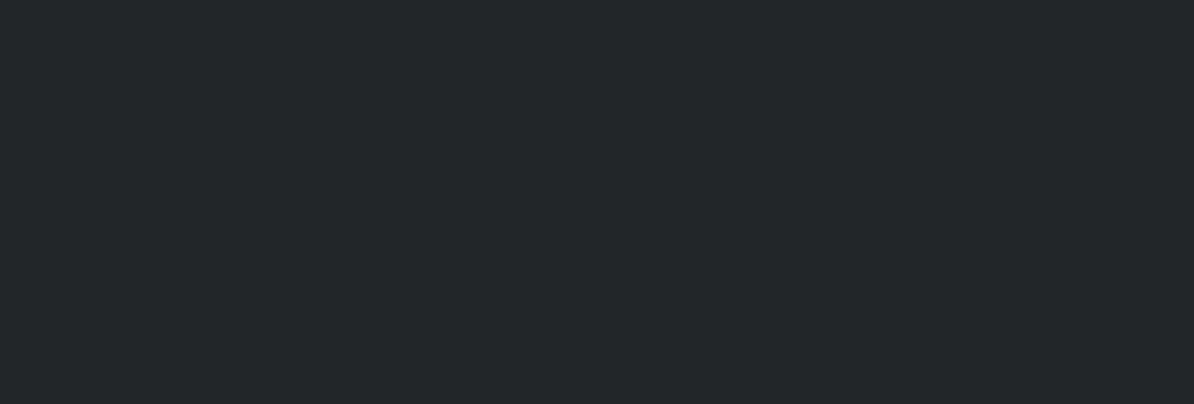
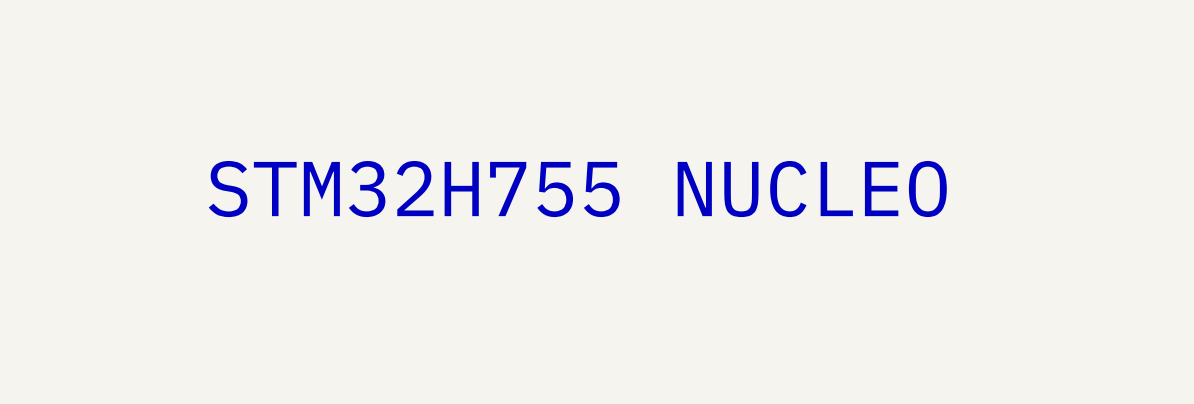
text: none -> STM32H755 NUCLEO (577, 189)

